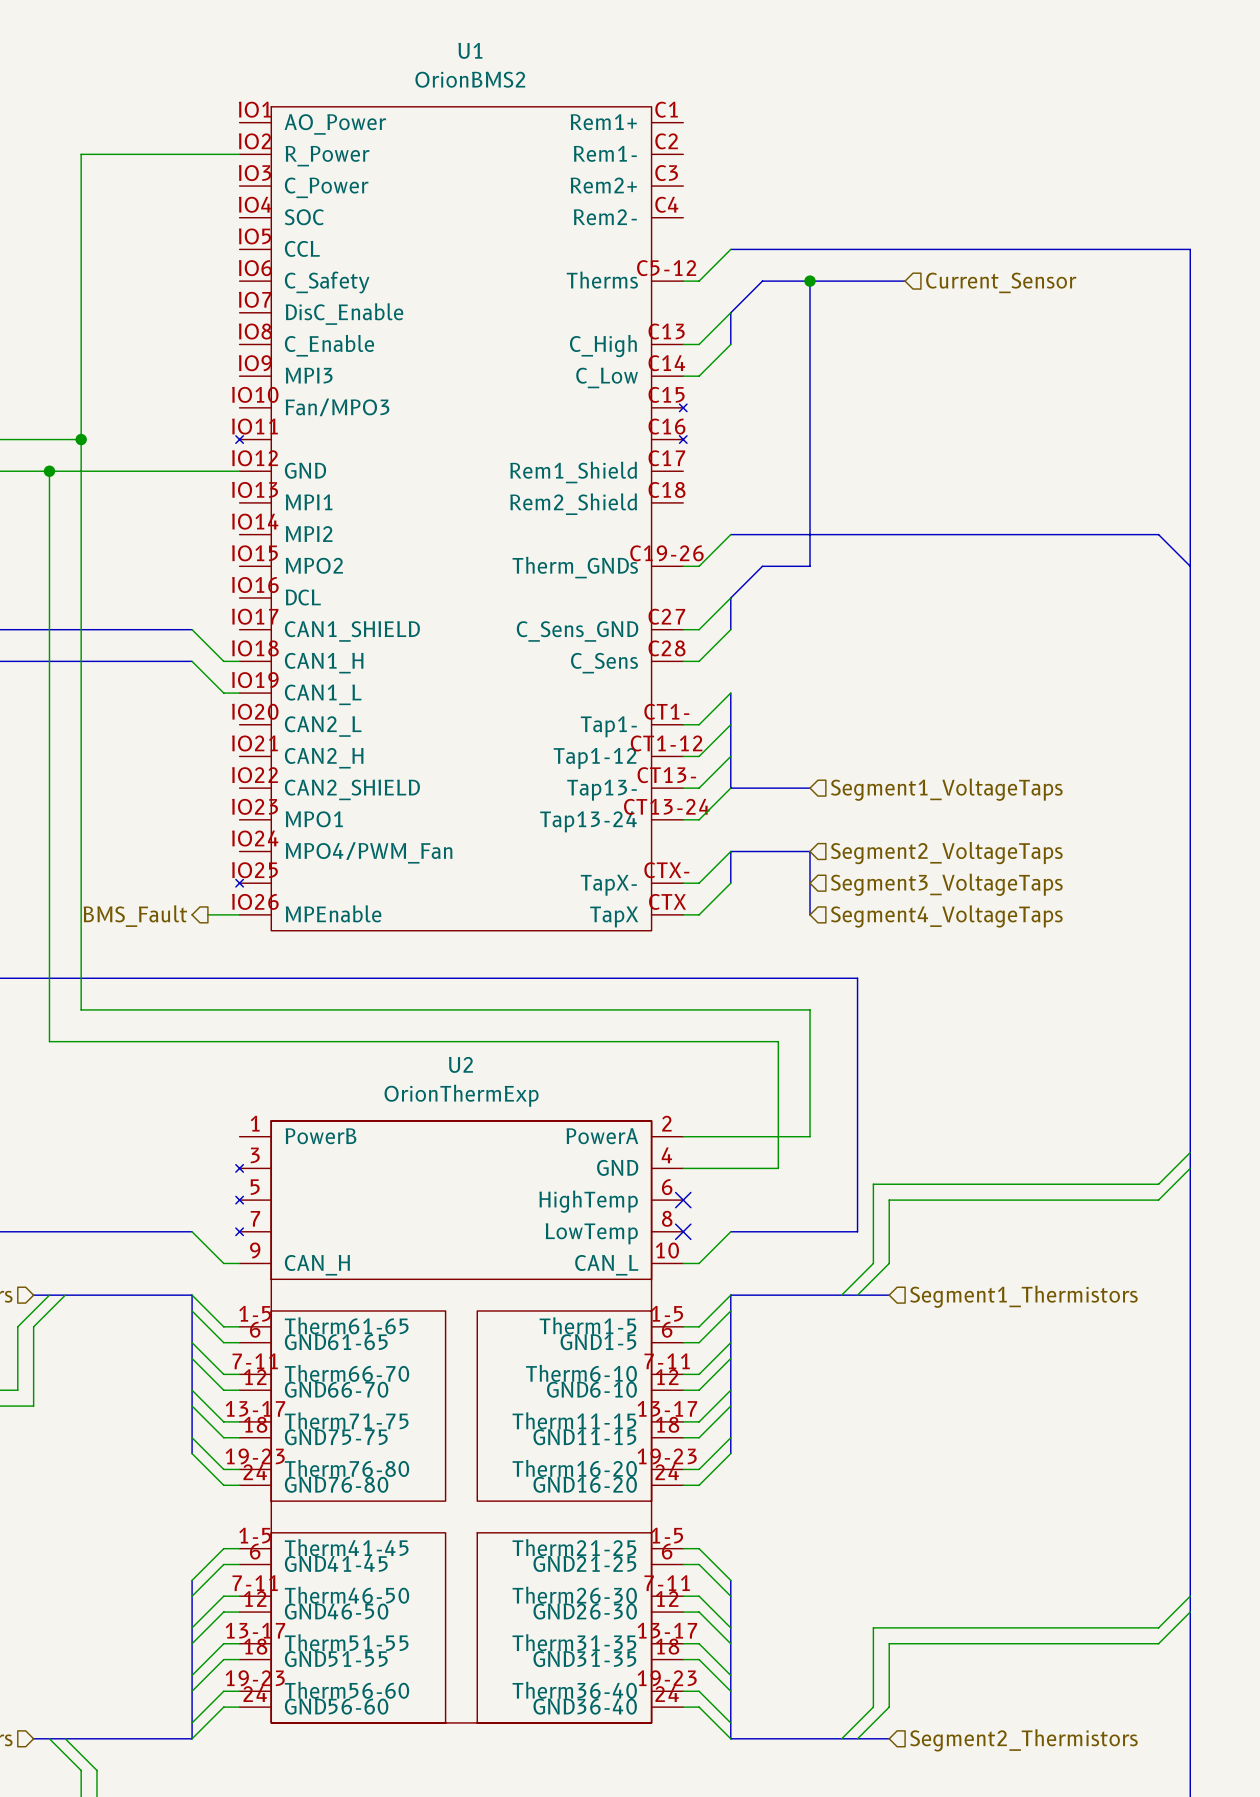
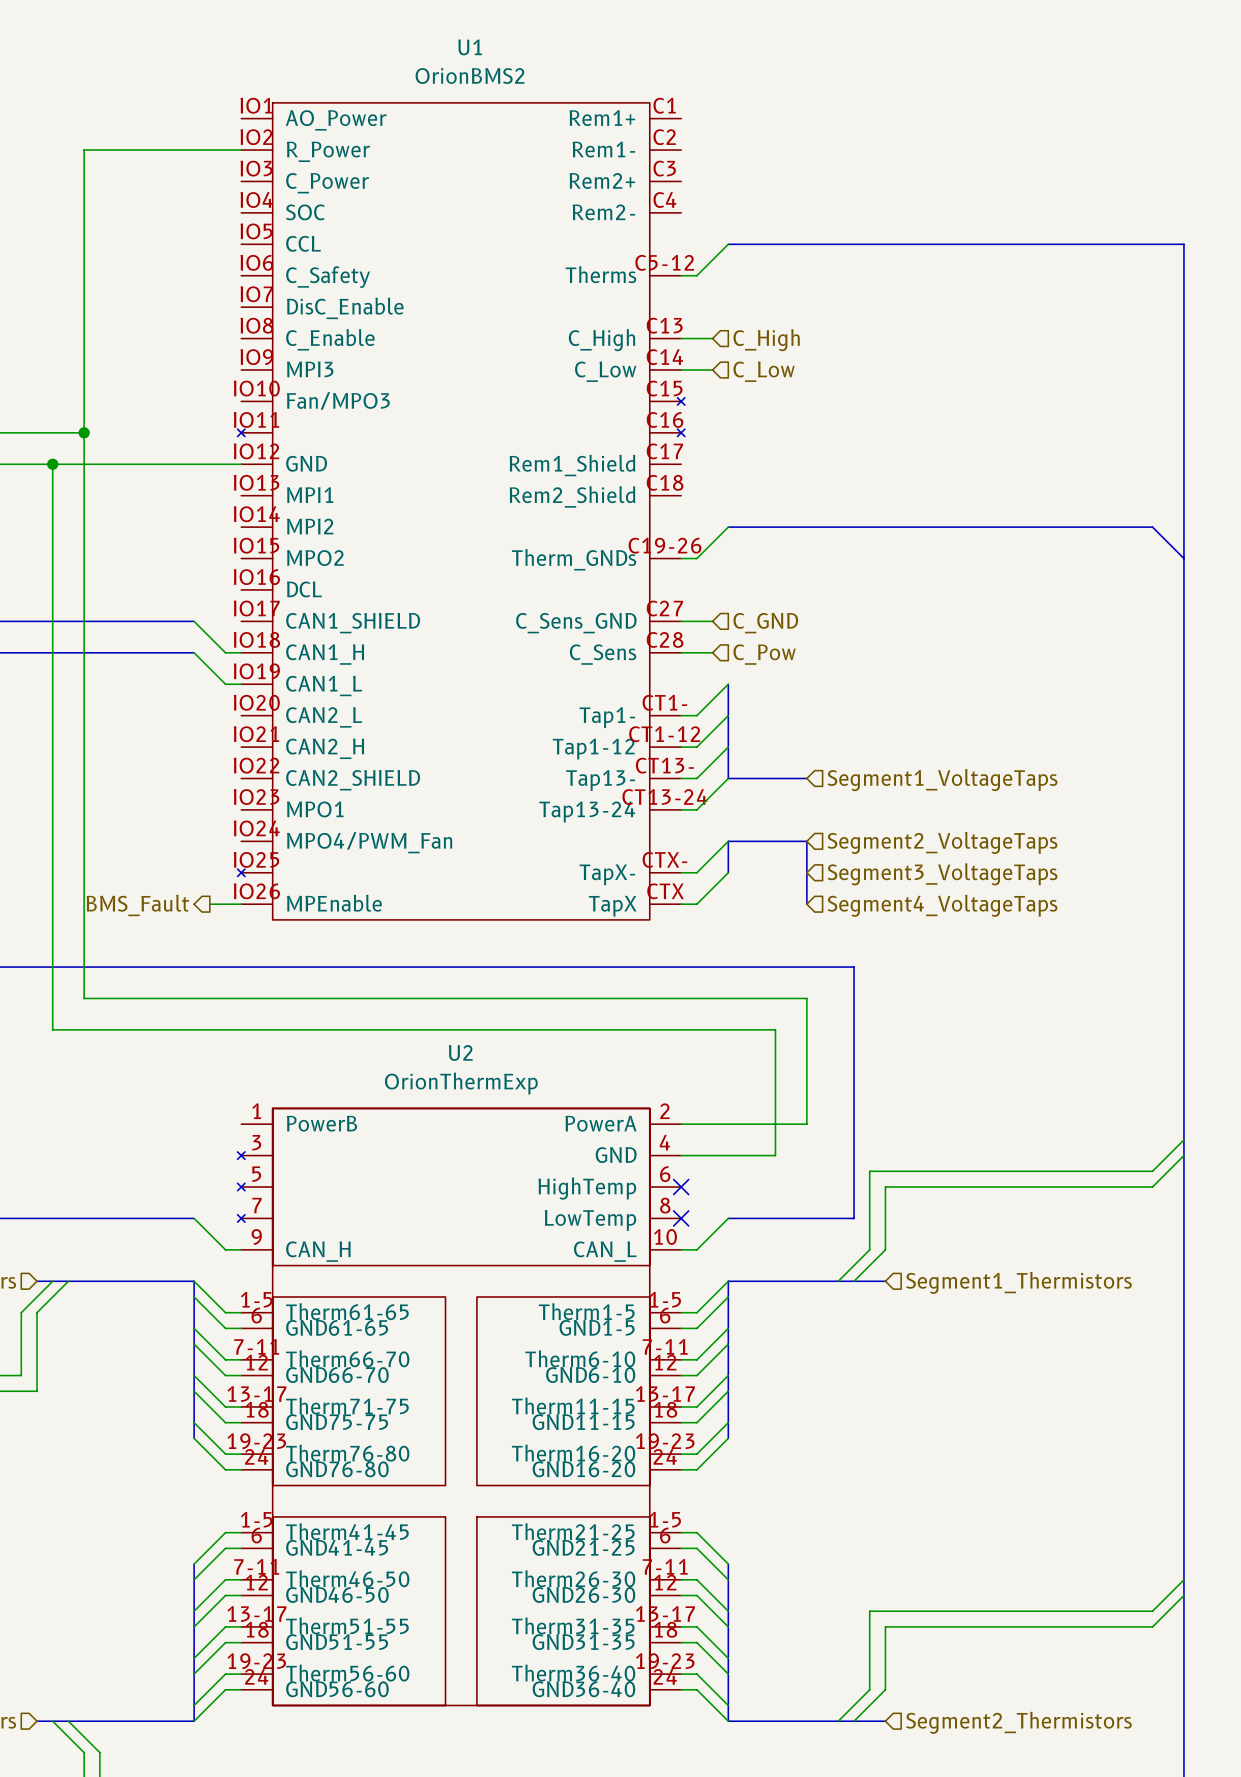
bus: (810, 281) (810, 566) (762, 566) (730, 598) (730, 629) -> none
junction: (810, 281) -> none
bus: (905, 281) (762, 281) (730, 312) (730, 344) -> none
hierarchical label: Current_Sensor (1001, 282) -> none
wire: (730, 312) (699, 344) -> (712, 338) (696, 338)
wire: (730, 344) (699, 376) -> (712, 369) (696, 369)
hierarchical label: none -> C_High (766, 340)
hierarchical label: none -> C_Low (764, 371)
wire: (730, 598) (699, 629) -> (712, 621) (696, 621)
wire: (730, 629) (699, 661) -> (712, 652) (696, 652)
hierarchical label: none -> C_GND (765, 623)
hierarchical label: none -> C_Pow (764, 654)

